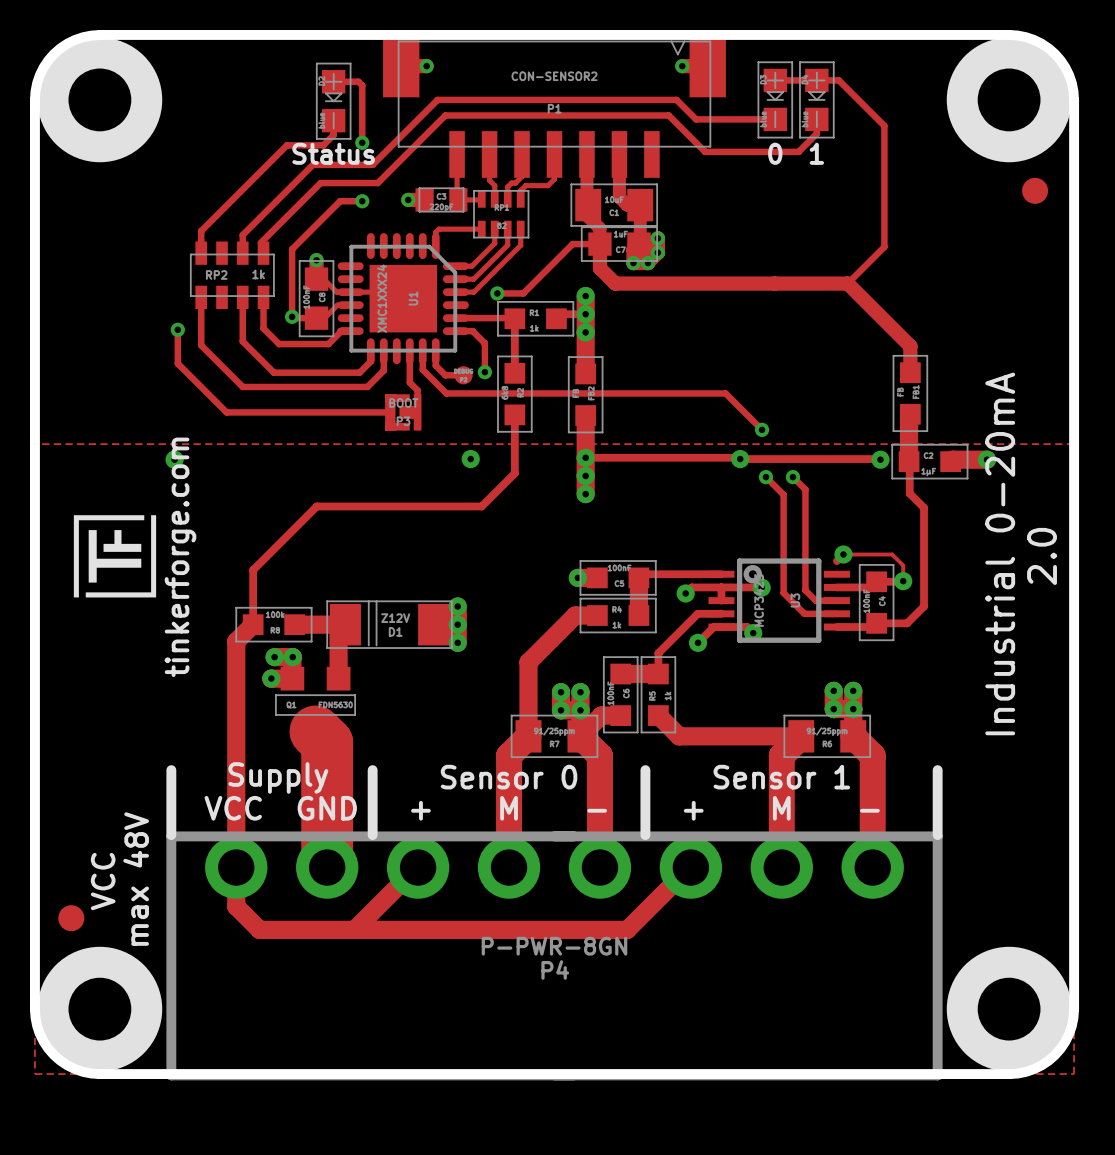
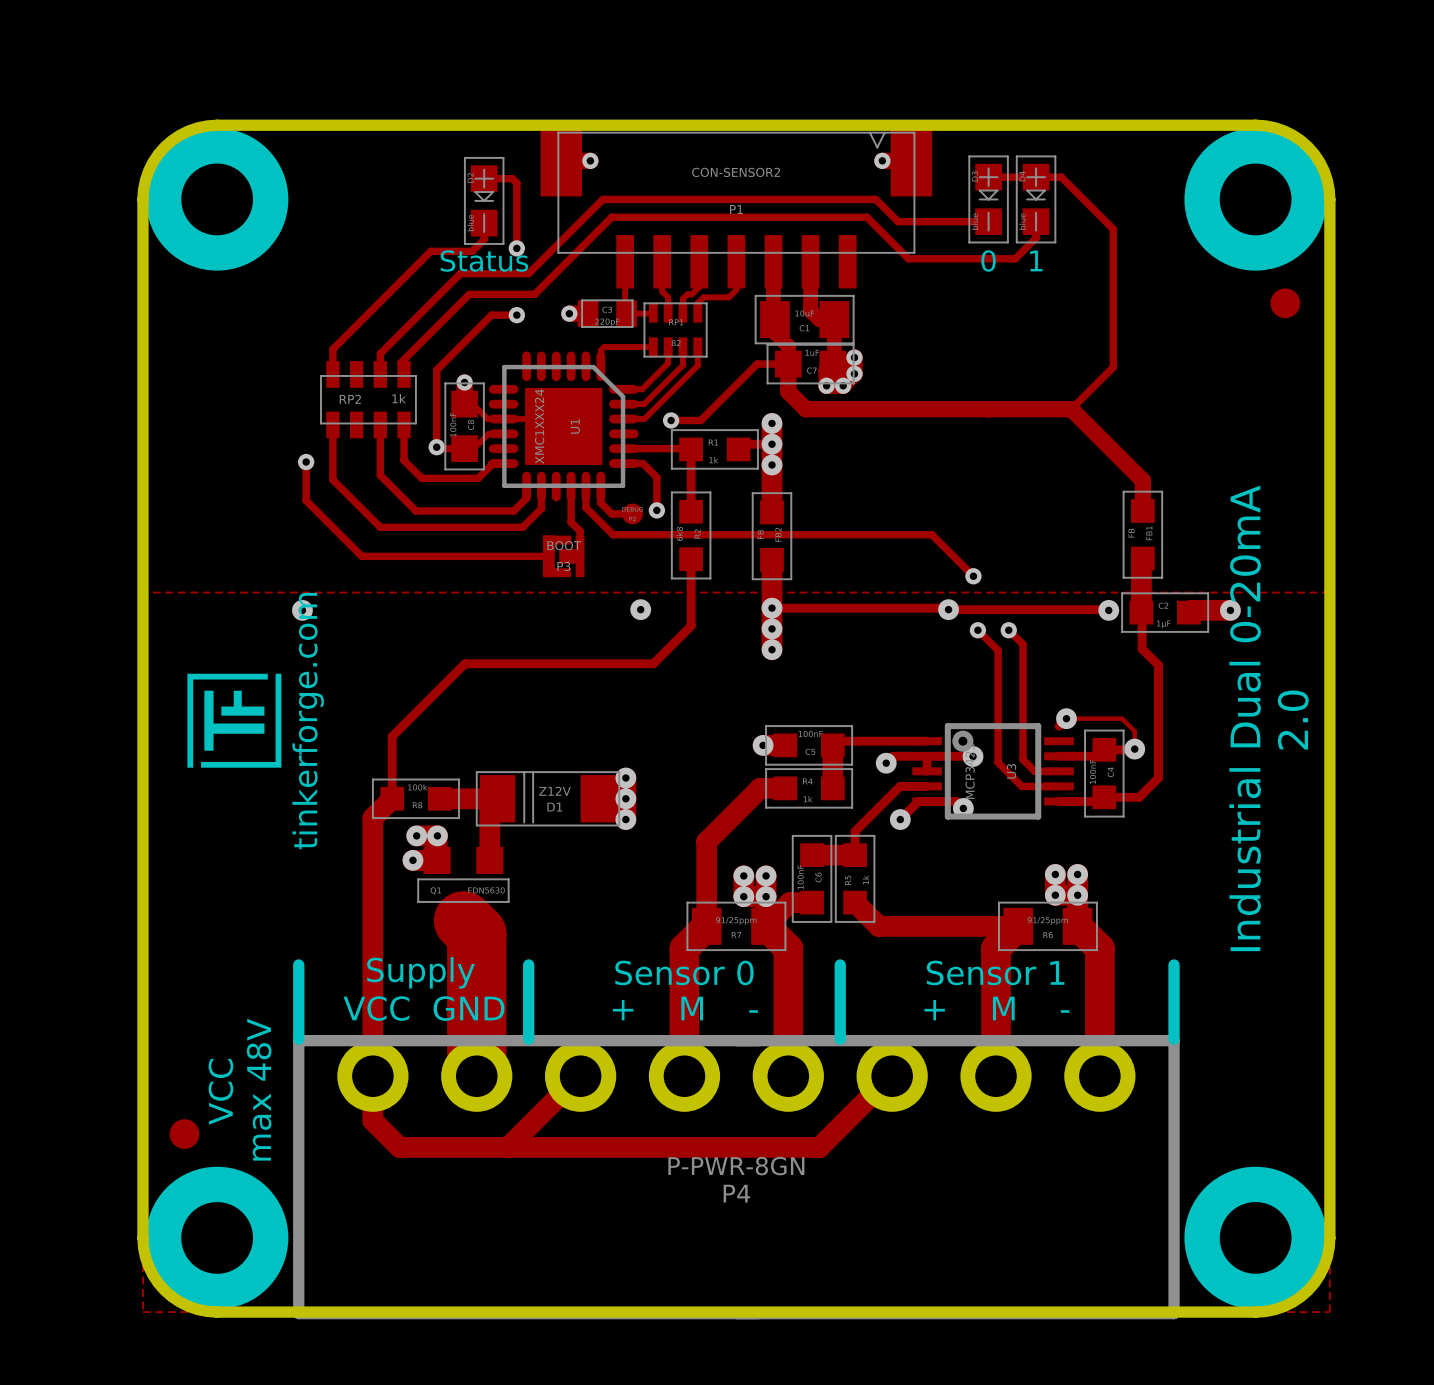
text: Industrial 0-20mA (1000, 553) -> Industrial Dual 0-20mA (1245, 718)

